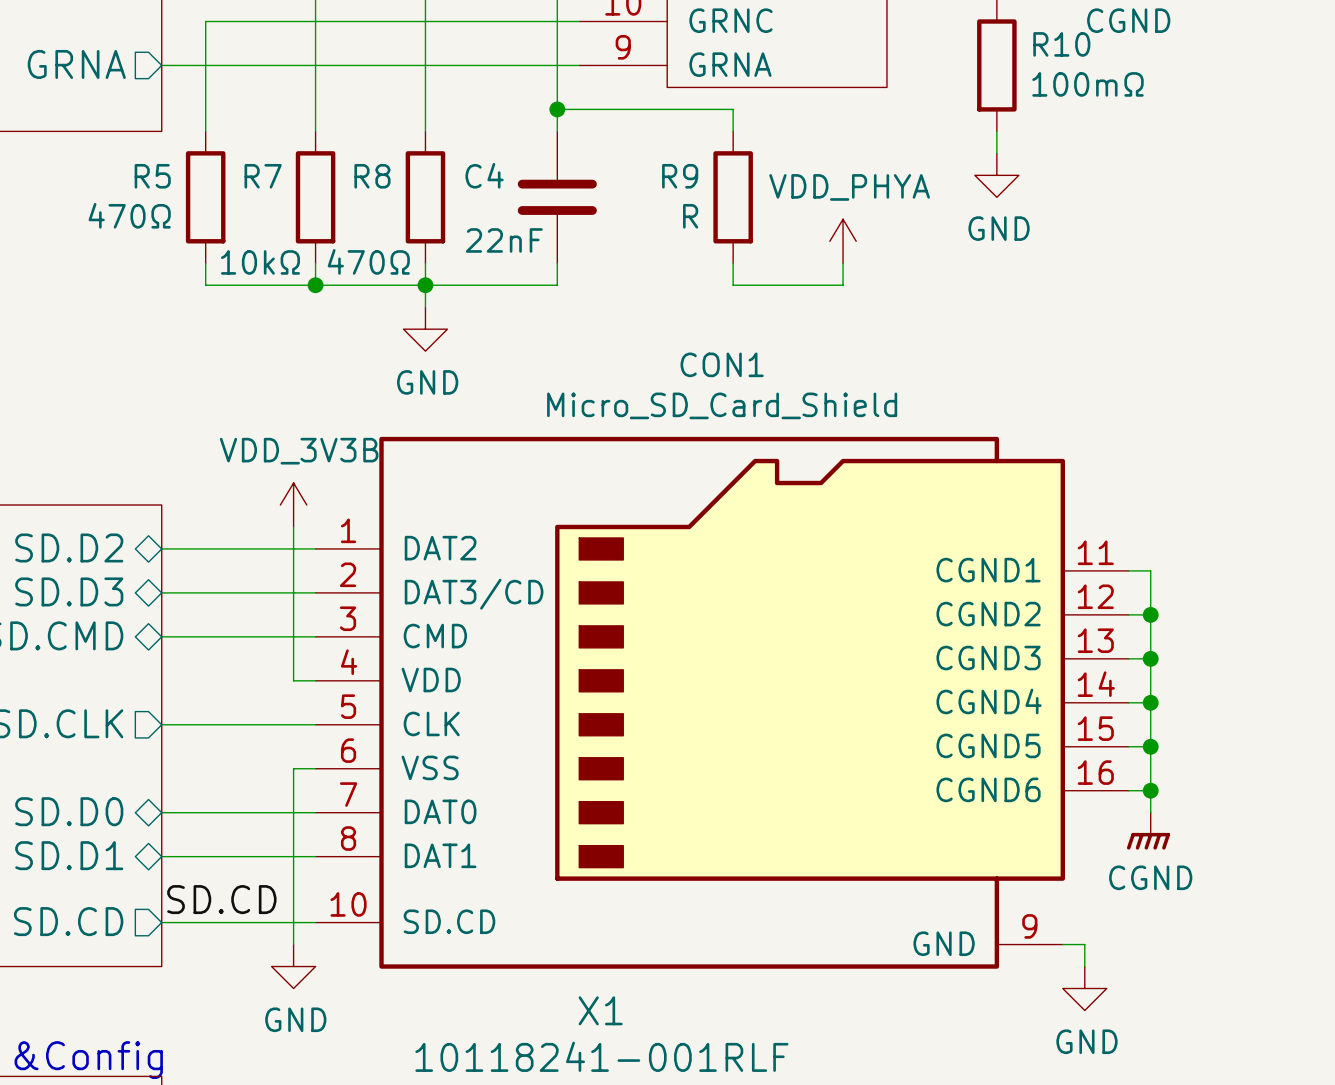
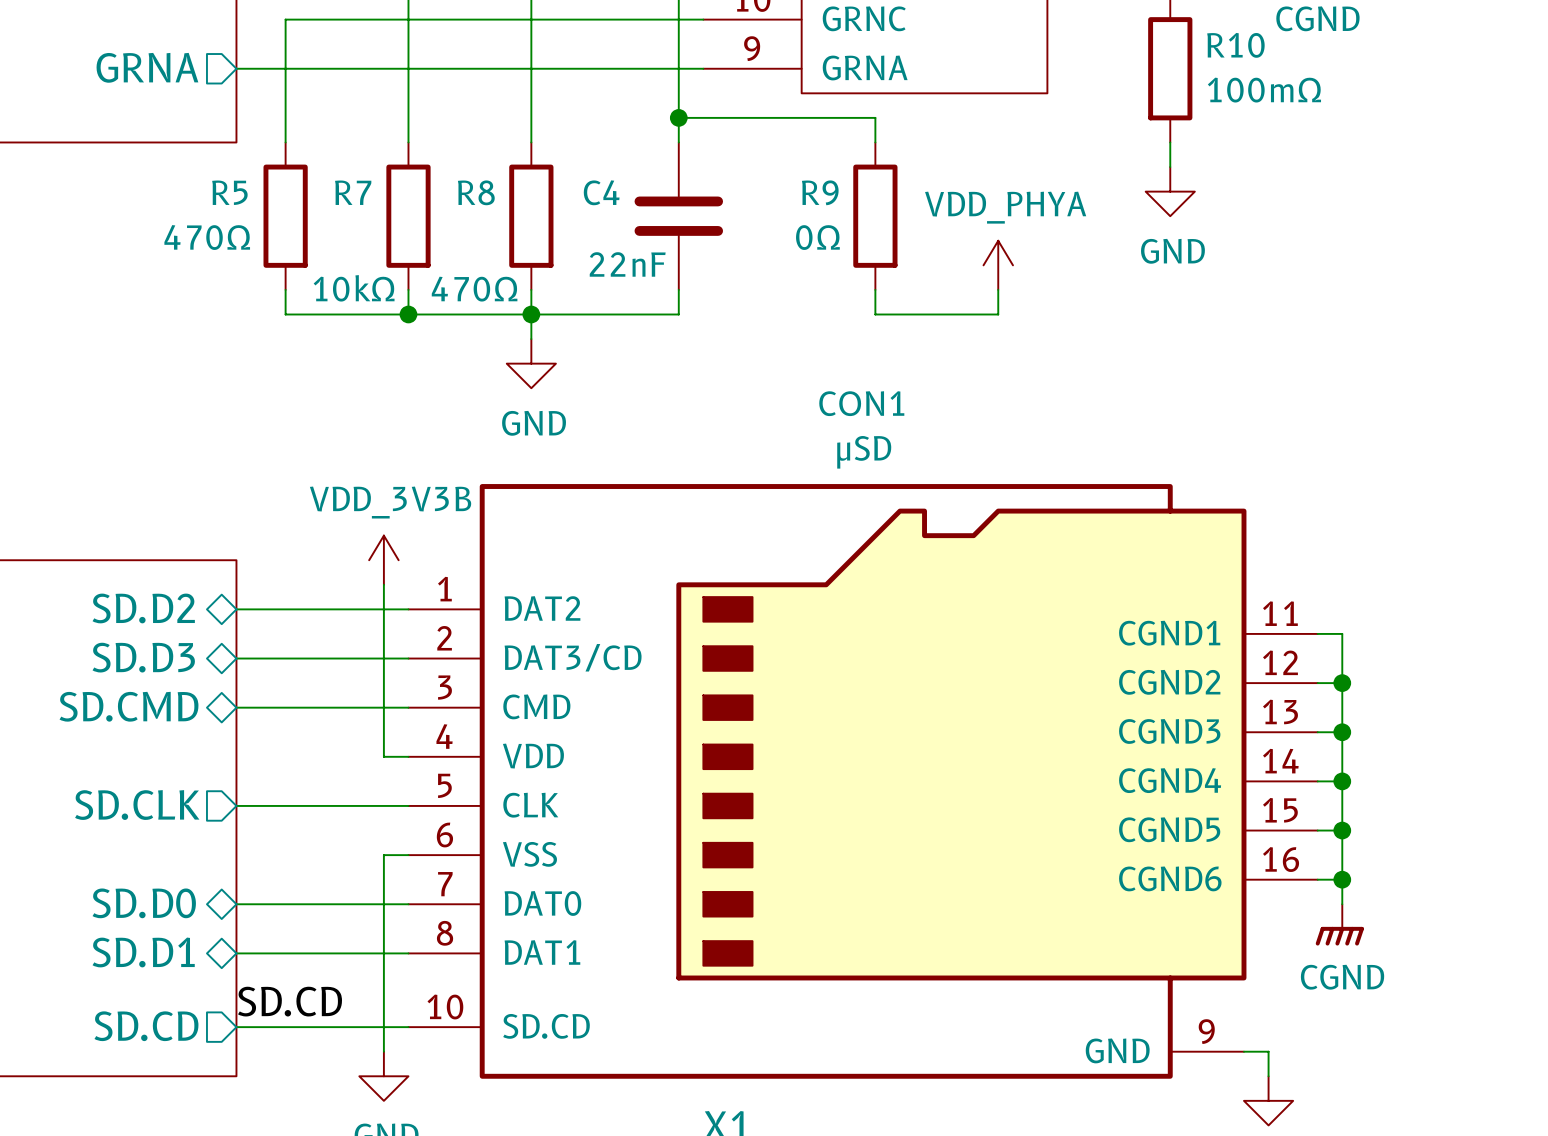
R9 value: R (690, 216) -> 0Ω (817, 237)
CON1 value: Micro_SD_Card_Shield (722, 405) -> μSD (864, 452)

